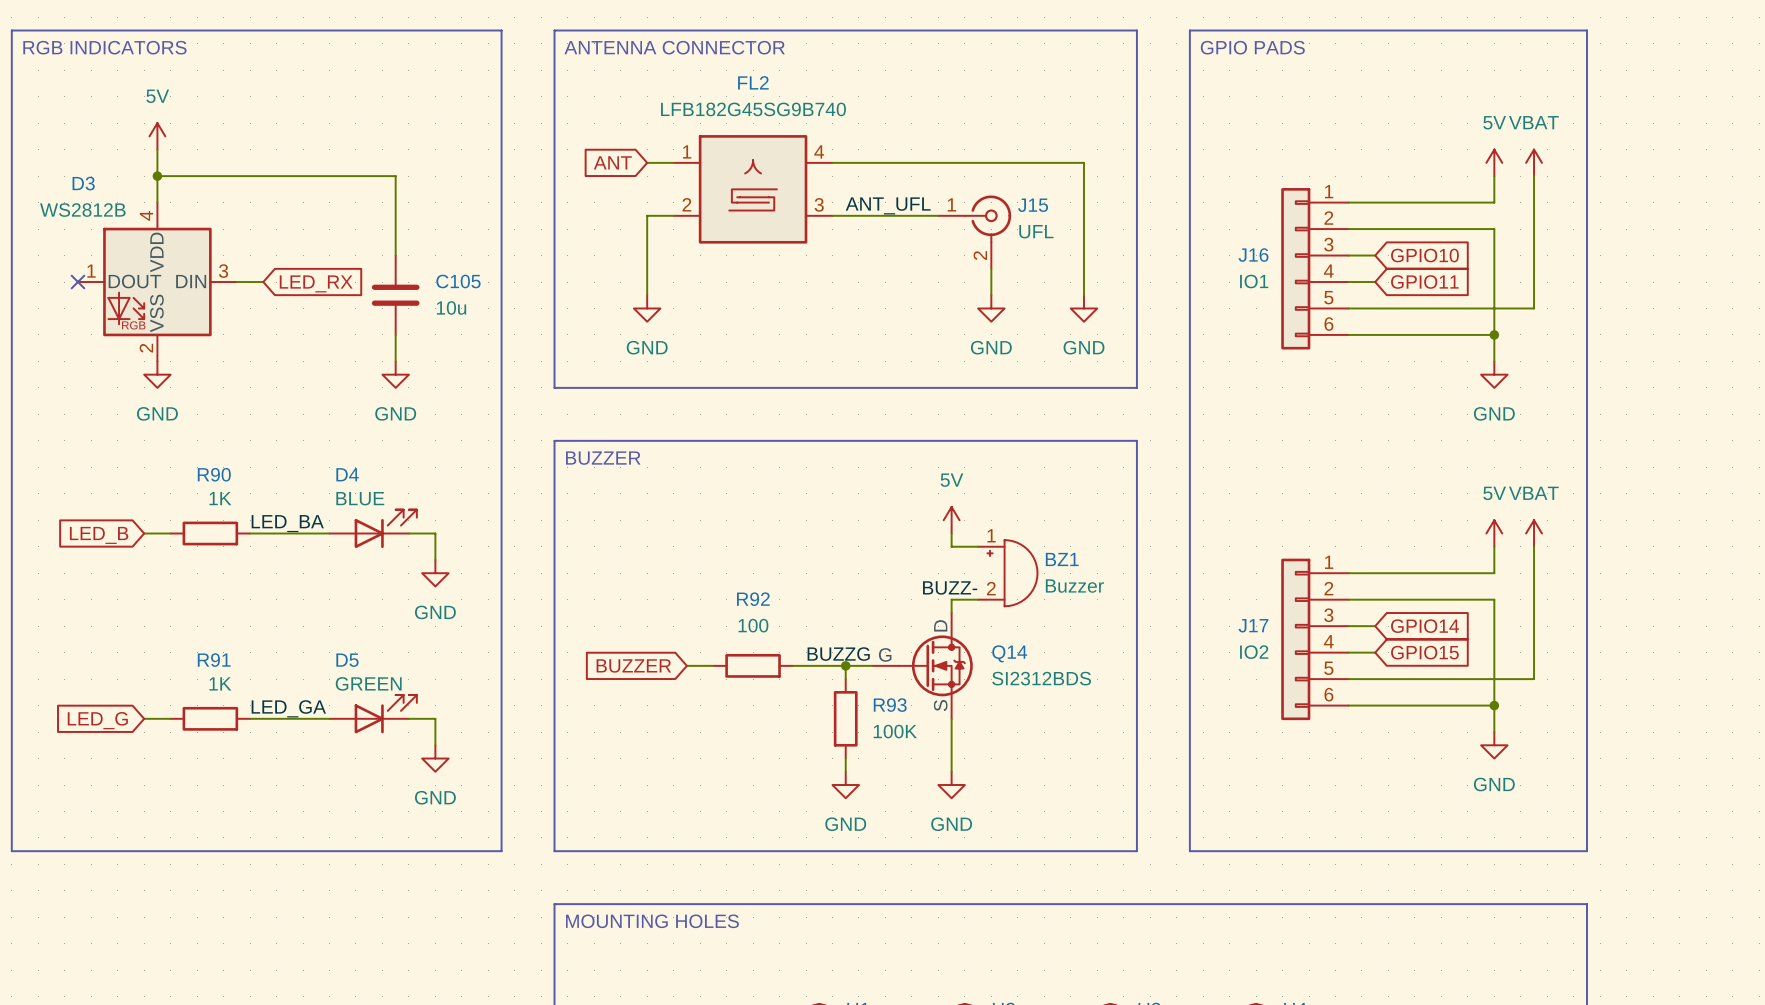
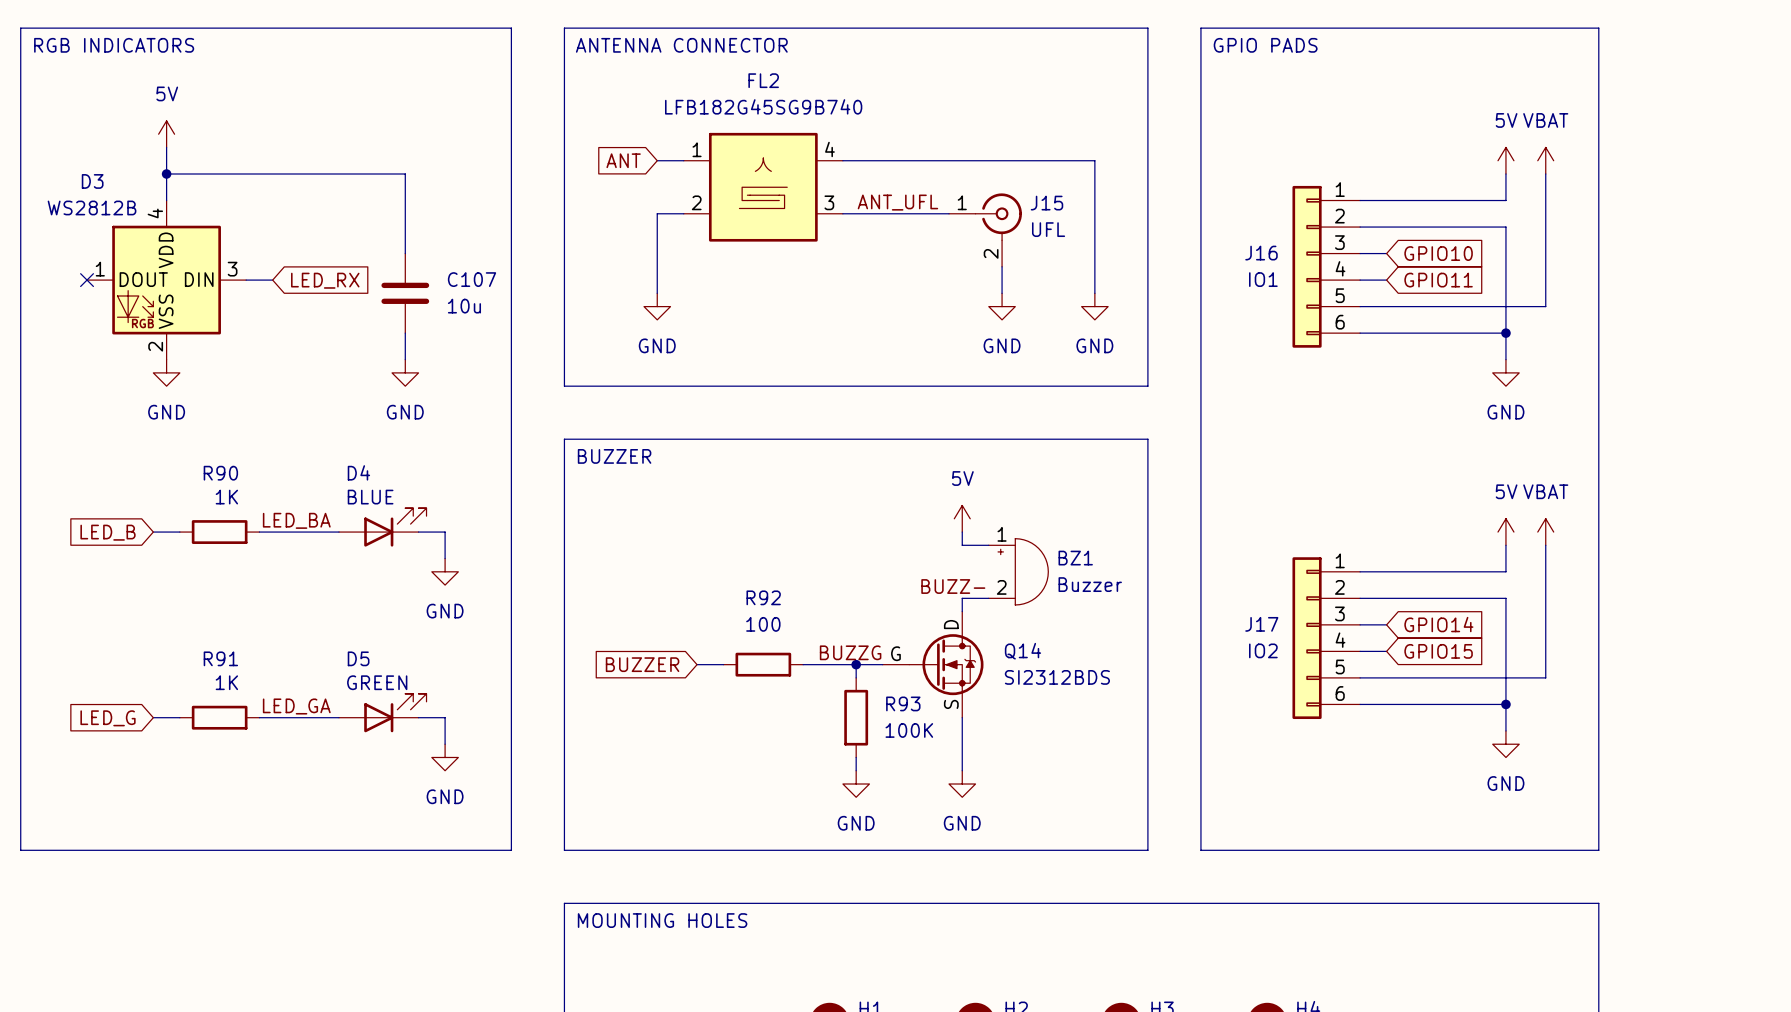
C105 name: C105 (458, 281) -> C107 (472, 279)

